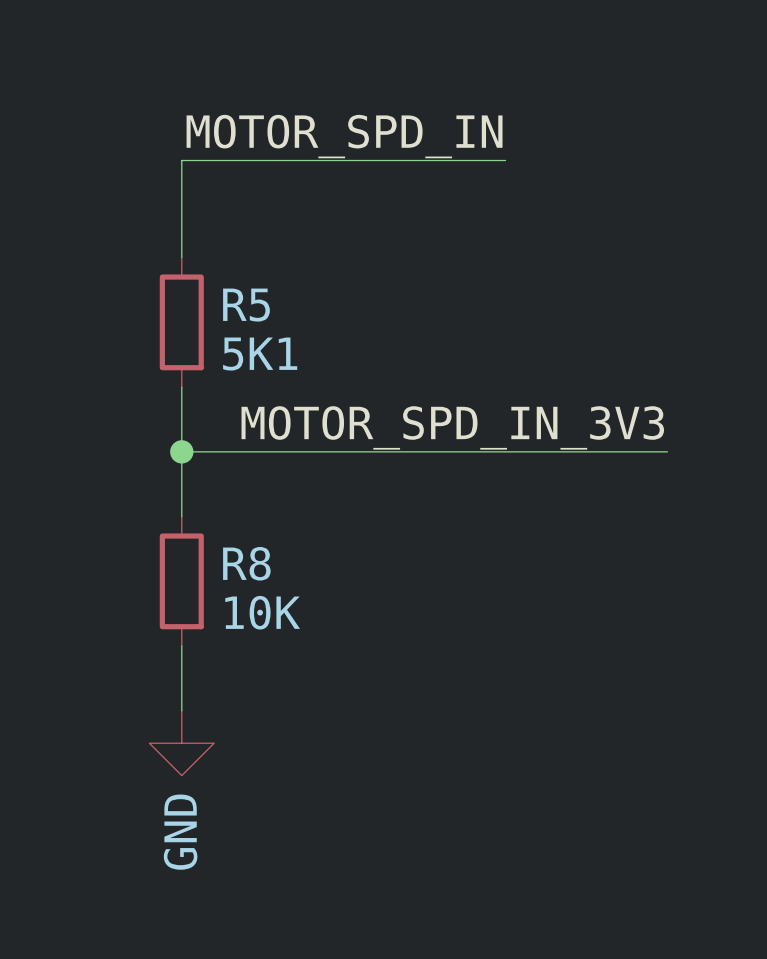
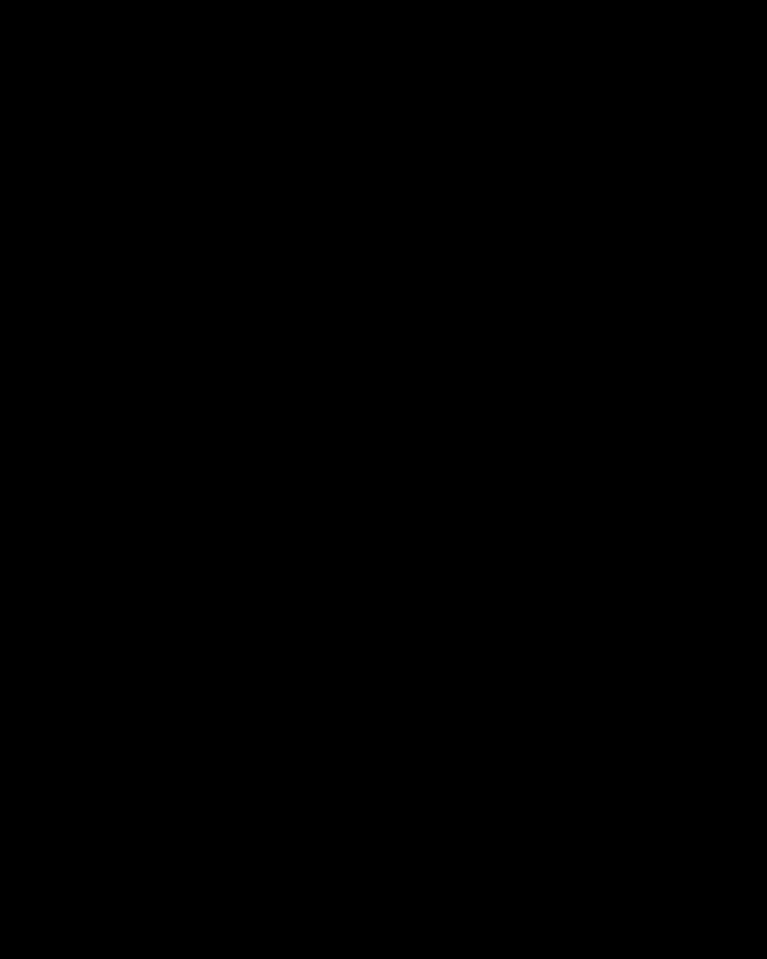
label: MOTOR_SPD_IN (344, 136) -> none
wire: (505, 160) (181, 160) (181, 257) -> none
R5: 5K1 (181, 322) -> none
wire: (181, 387) (181, 516) -> none
label: MOTOR_SPD_IN_3V3 (452, 427) -> none
wire: (181, 451) (667, 451) -> none
junction: (181, 451) -> none
R8: 10K (181, 581) -> none
wire: (181, 646) (181, 710) -> none
power symbol: GND (181, 743) -> none

